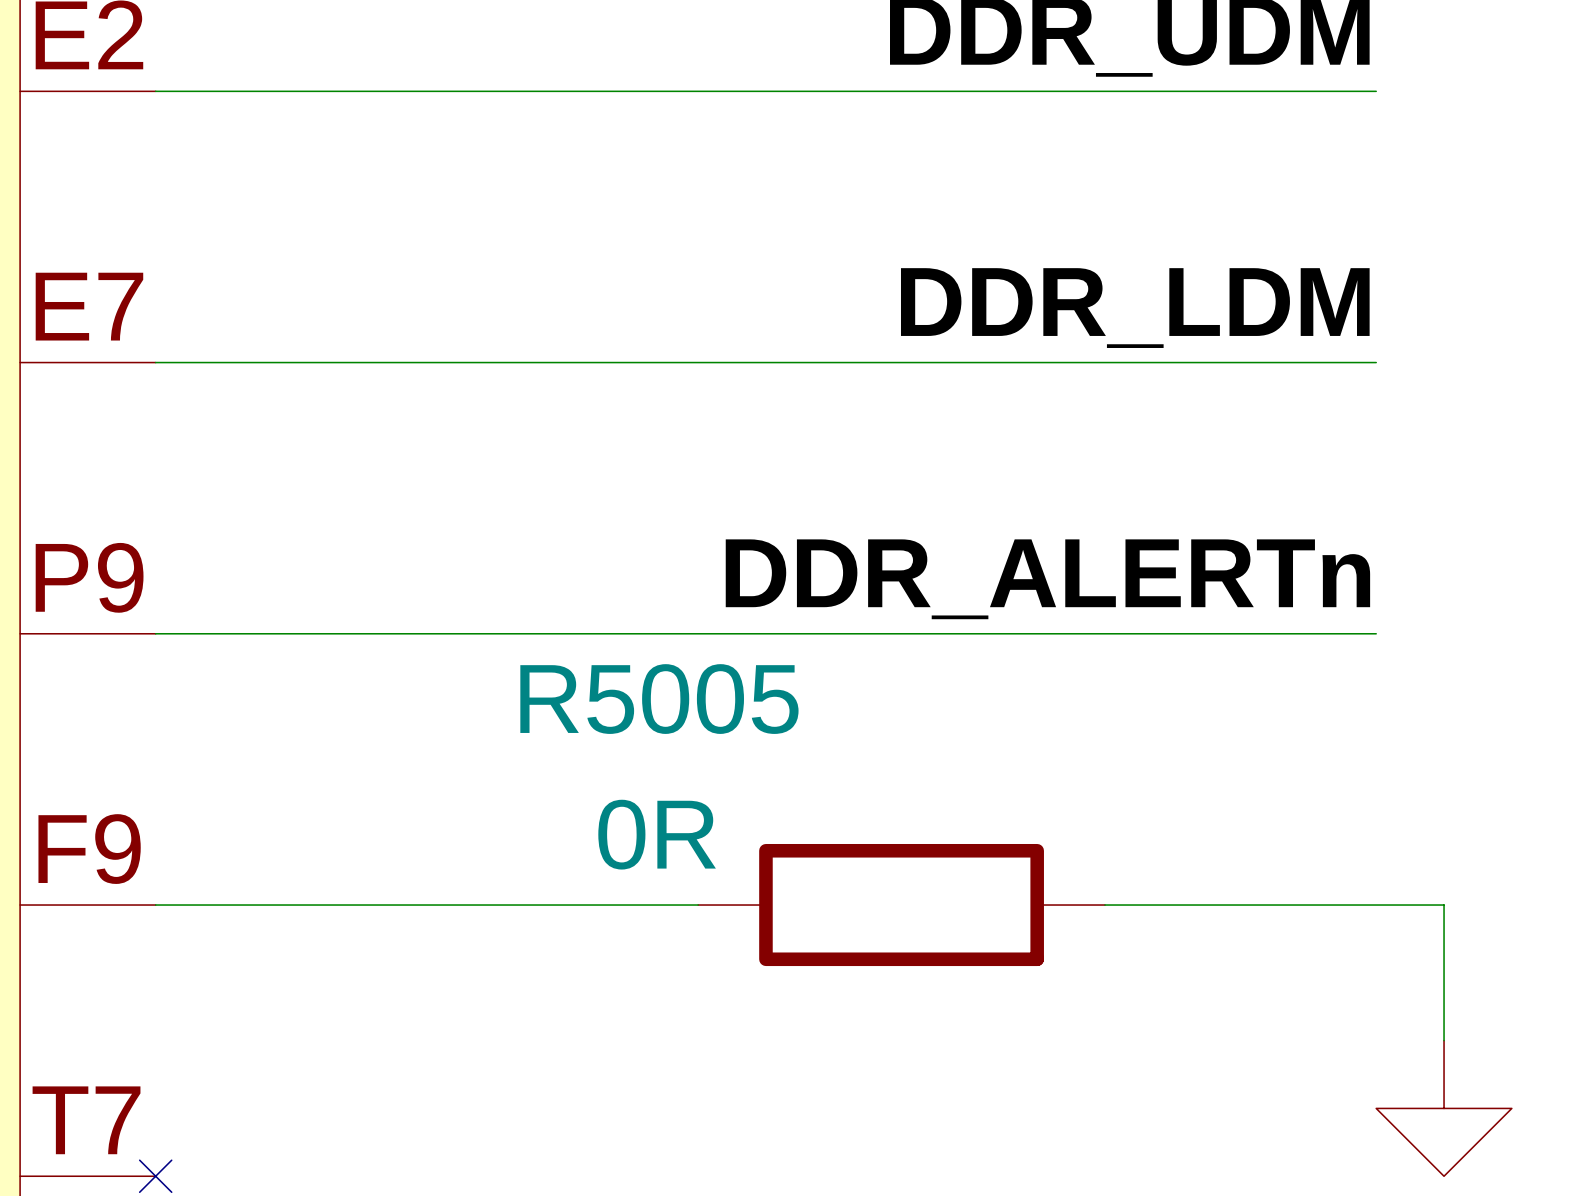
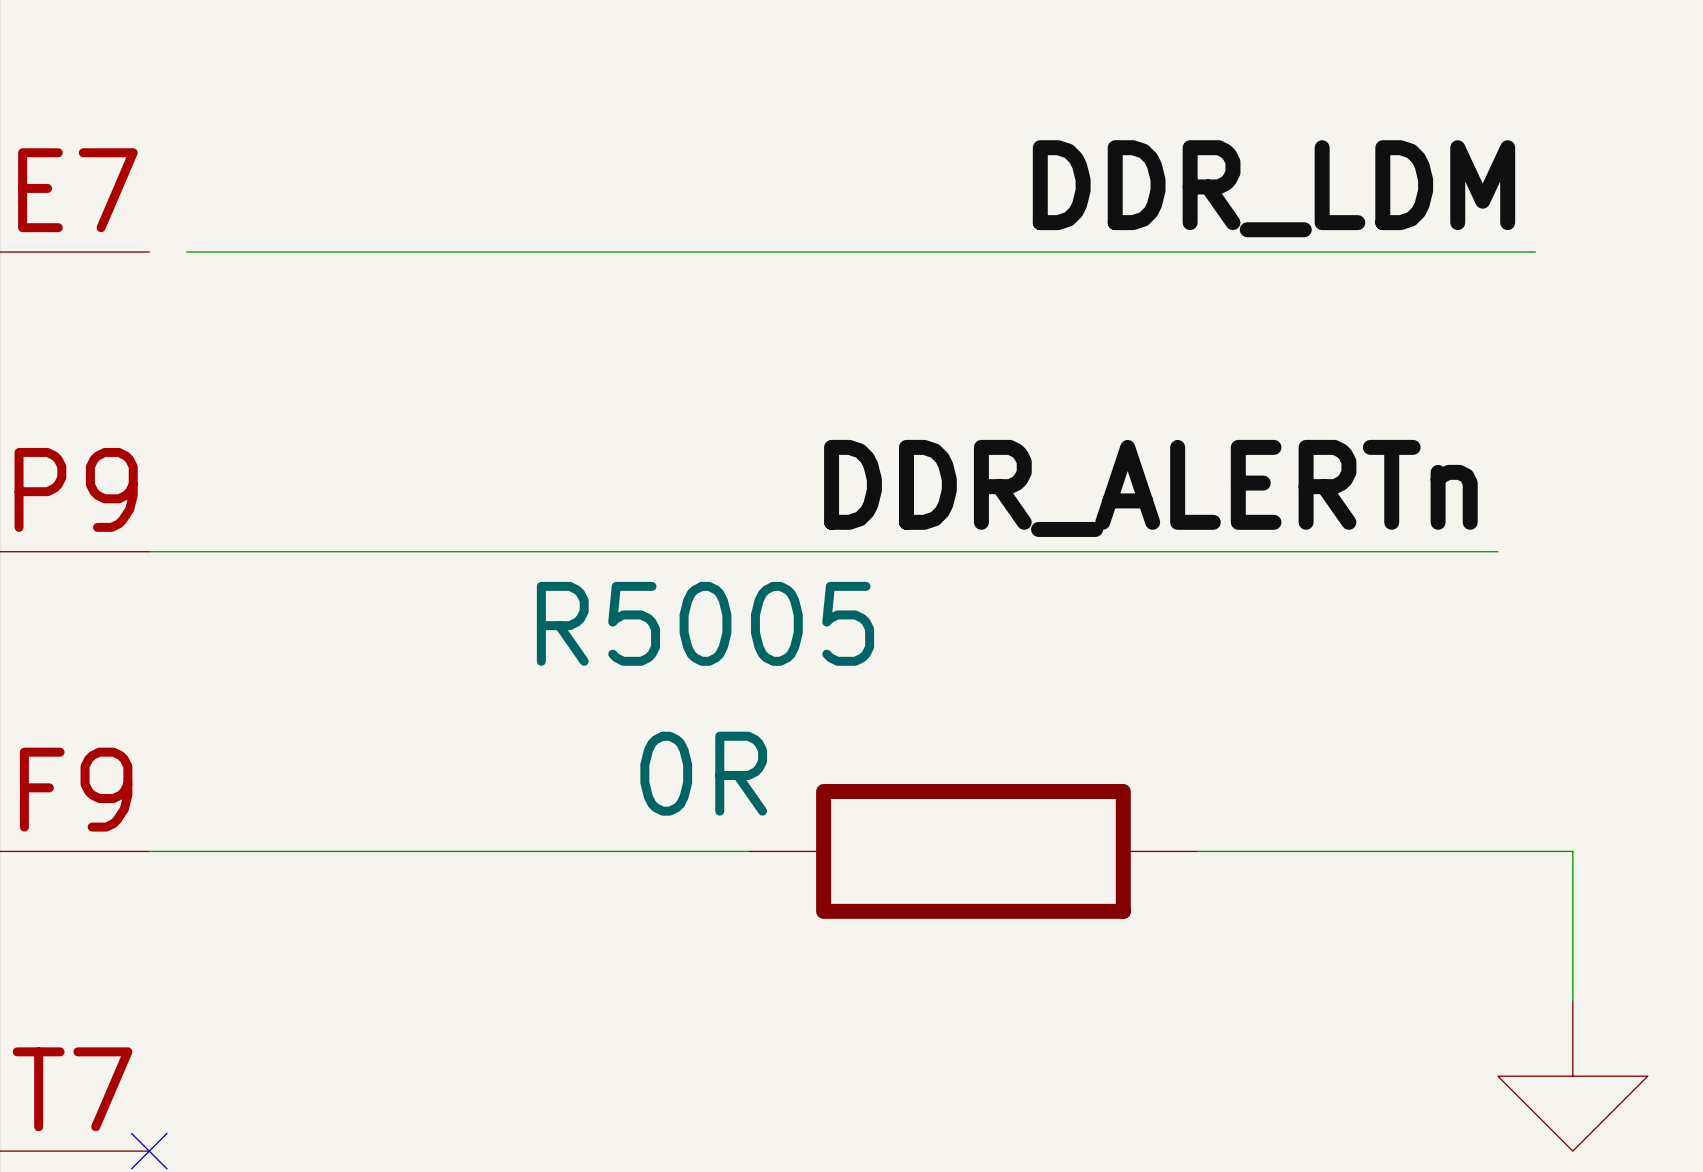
label position: DDR_LDM (1135, 308) -> DDR_LDM (1273, 188)
wire: (155, 362) (189, 362) -> (1497, 252) (1535, 252)

